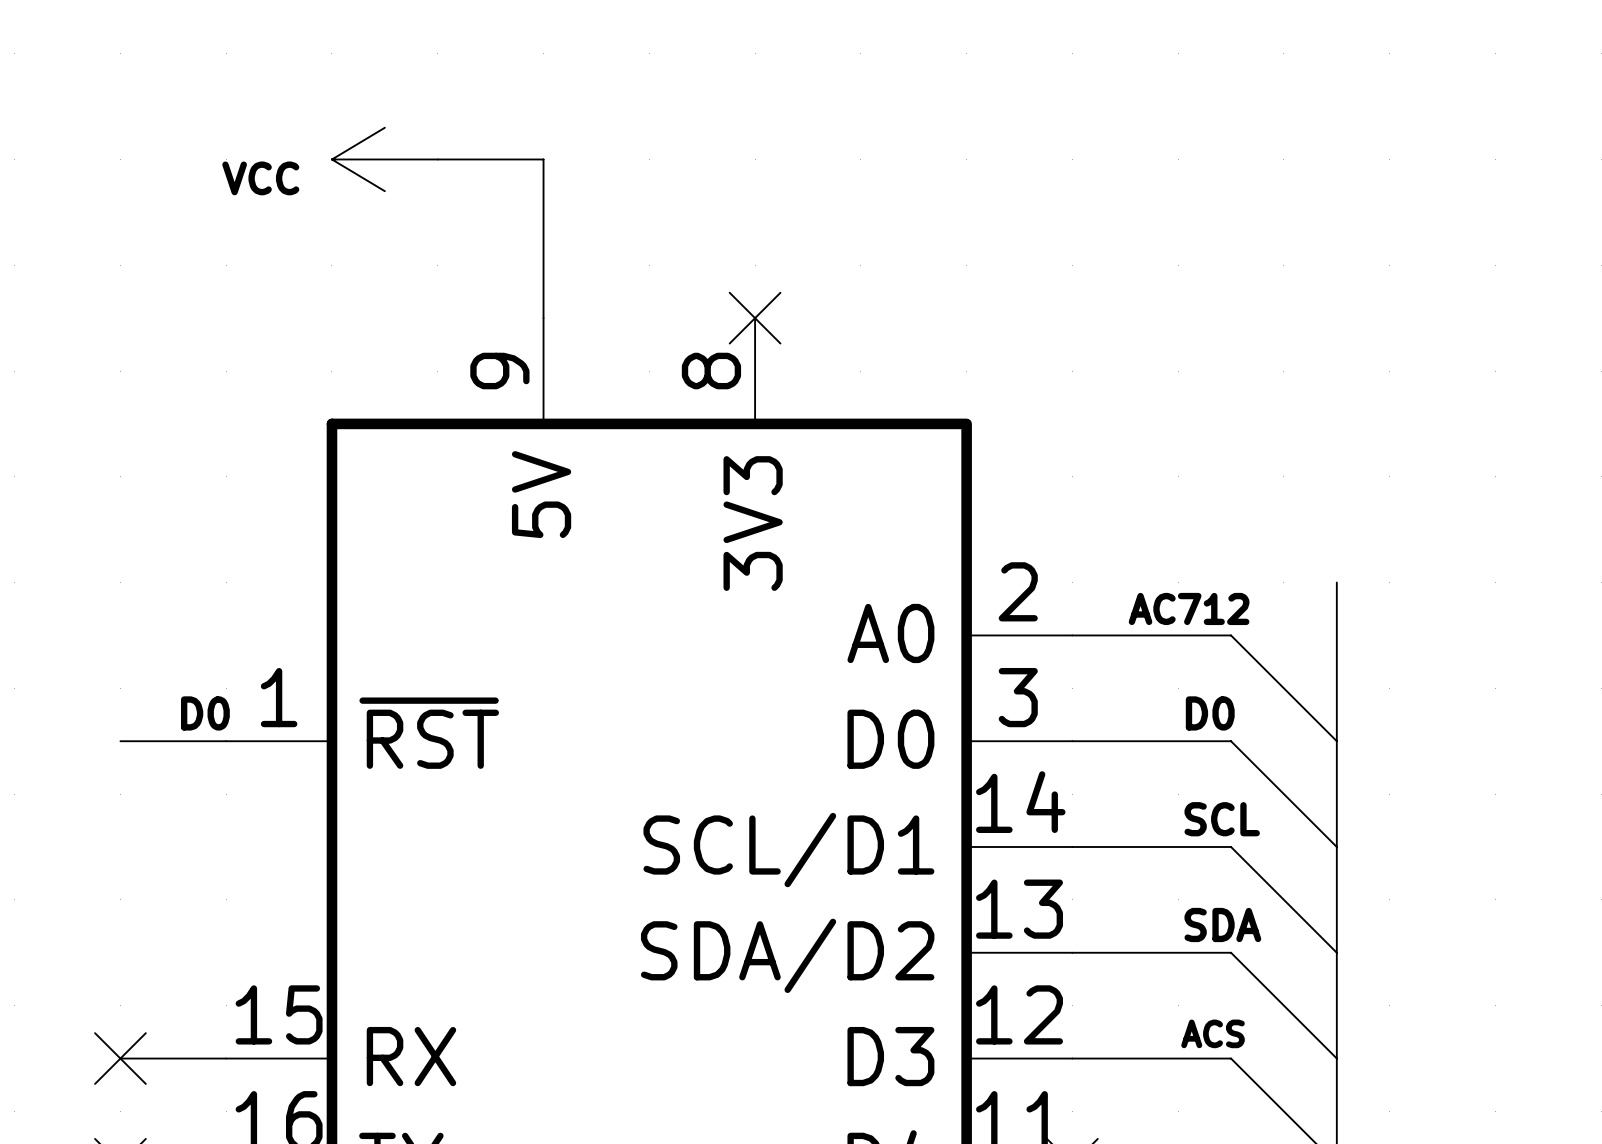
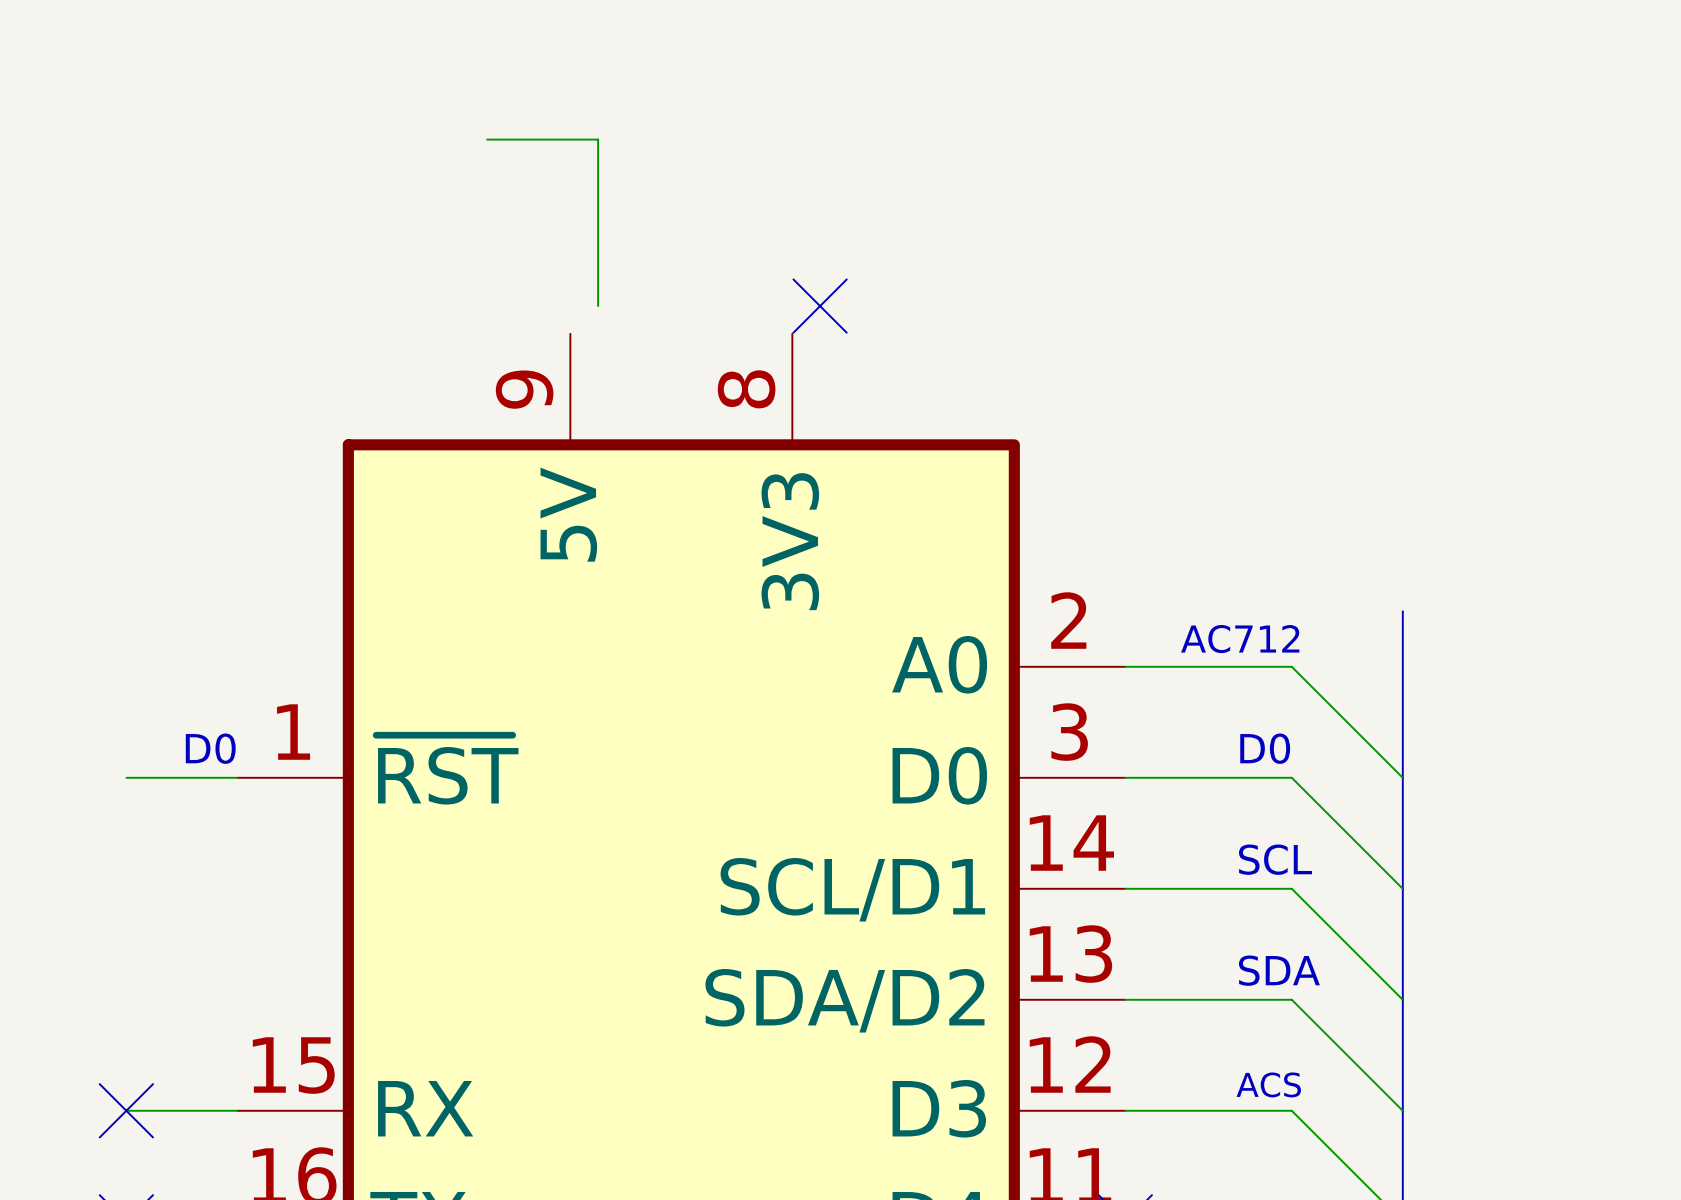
power symbol: VCC (384, 159) -> none
wire: (437, 159) (543, 159) (543, 318) -> (487, 139) (598, 139) (598, 306)
no-connect mark position: (755, 318) -> (820, 306)

